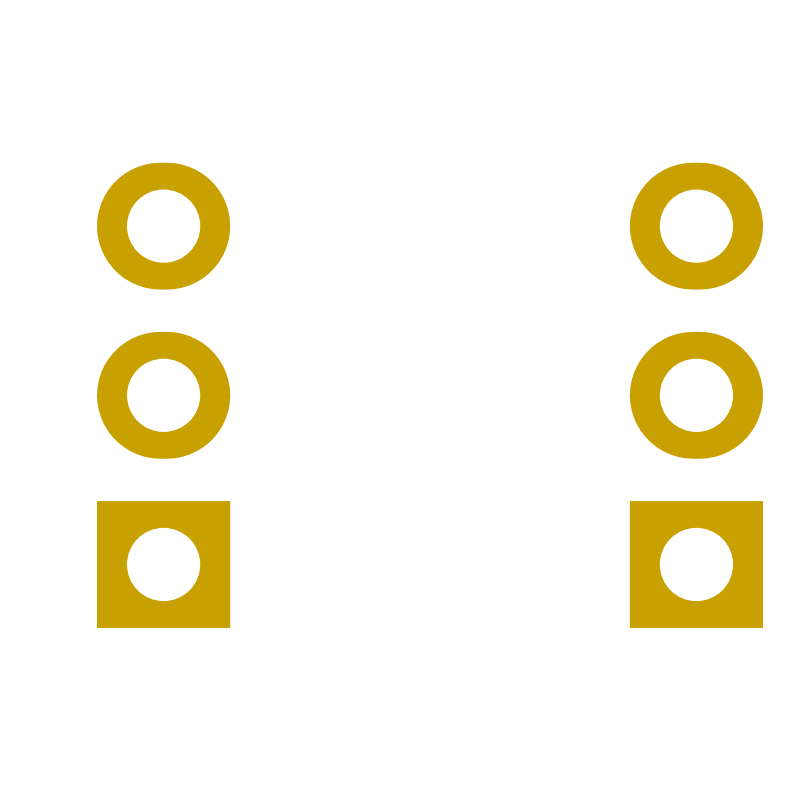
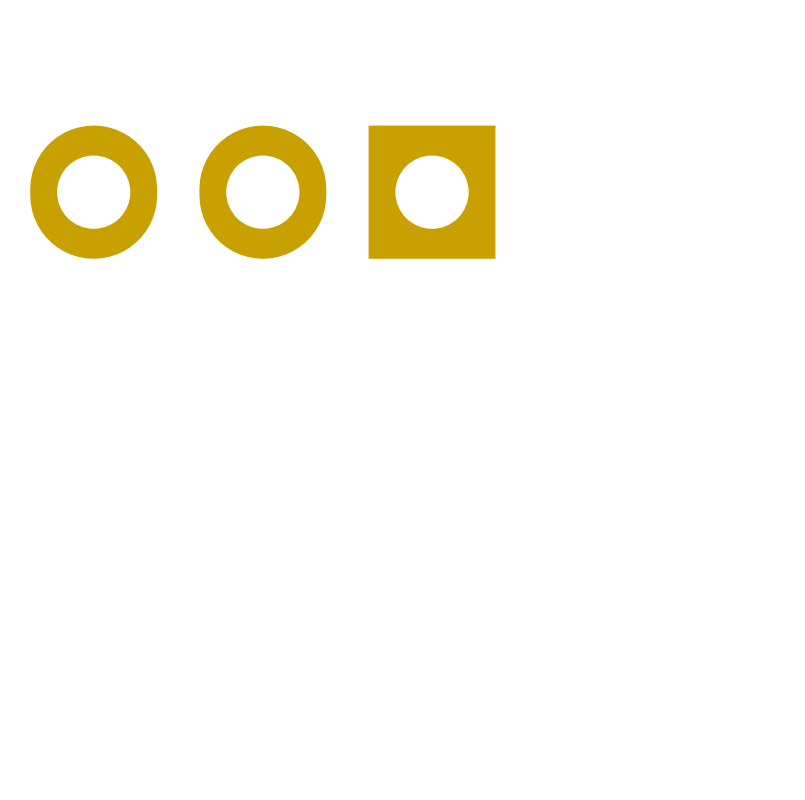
part rotation: 0° (163, 395) -> 90° counterclockwise (262, 192)
part: (696, 395) -> none

